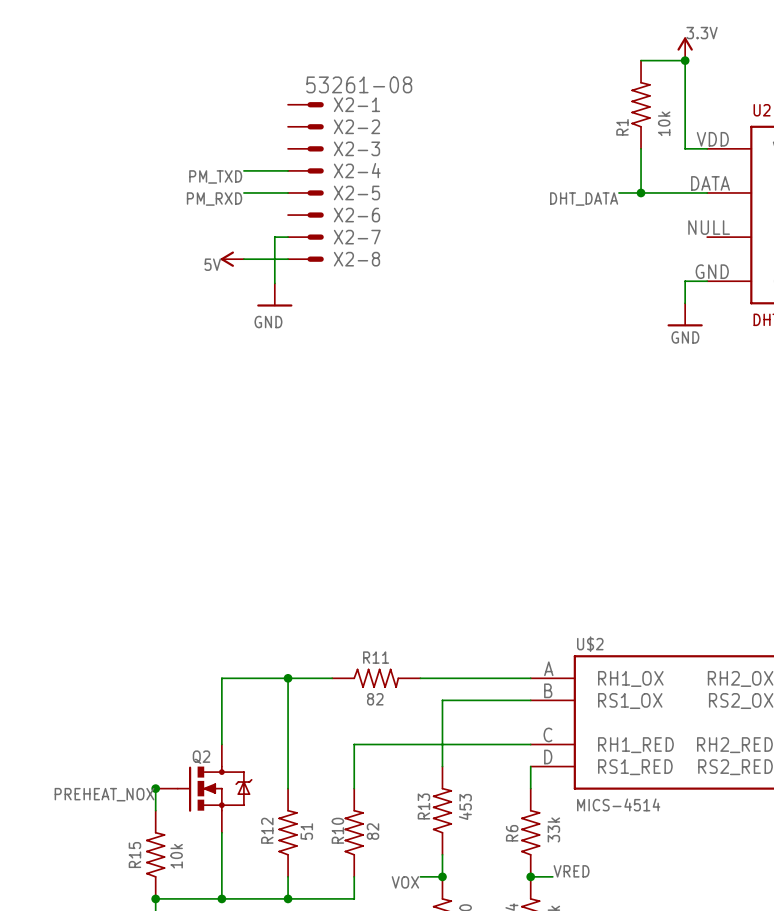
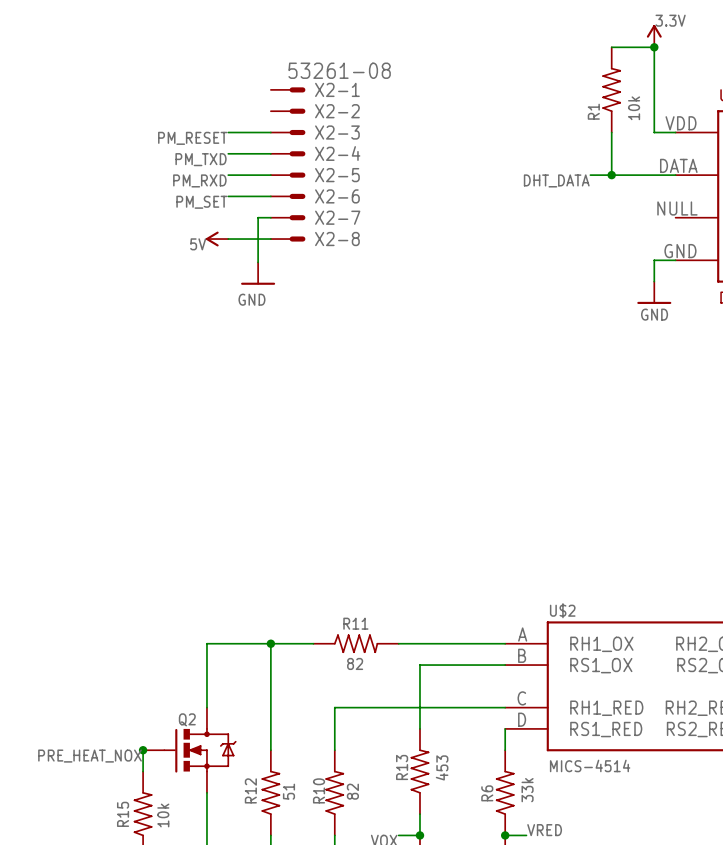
wire: none -> (228, 132) (270, 132)
label: none -> PM_RESET (192, 138)
wire: none -> (228, 196) (270, 196)
label: none -> PM_SET (201, 202)
label: PREHEAT_NOX (104, 794) -> PRE_HEAT_NOX (90, 756)

